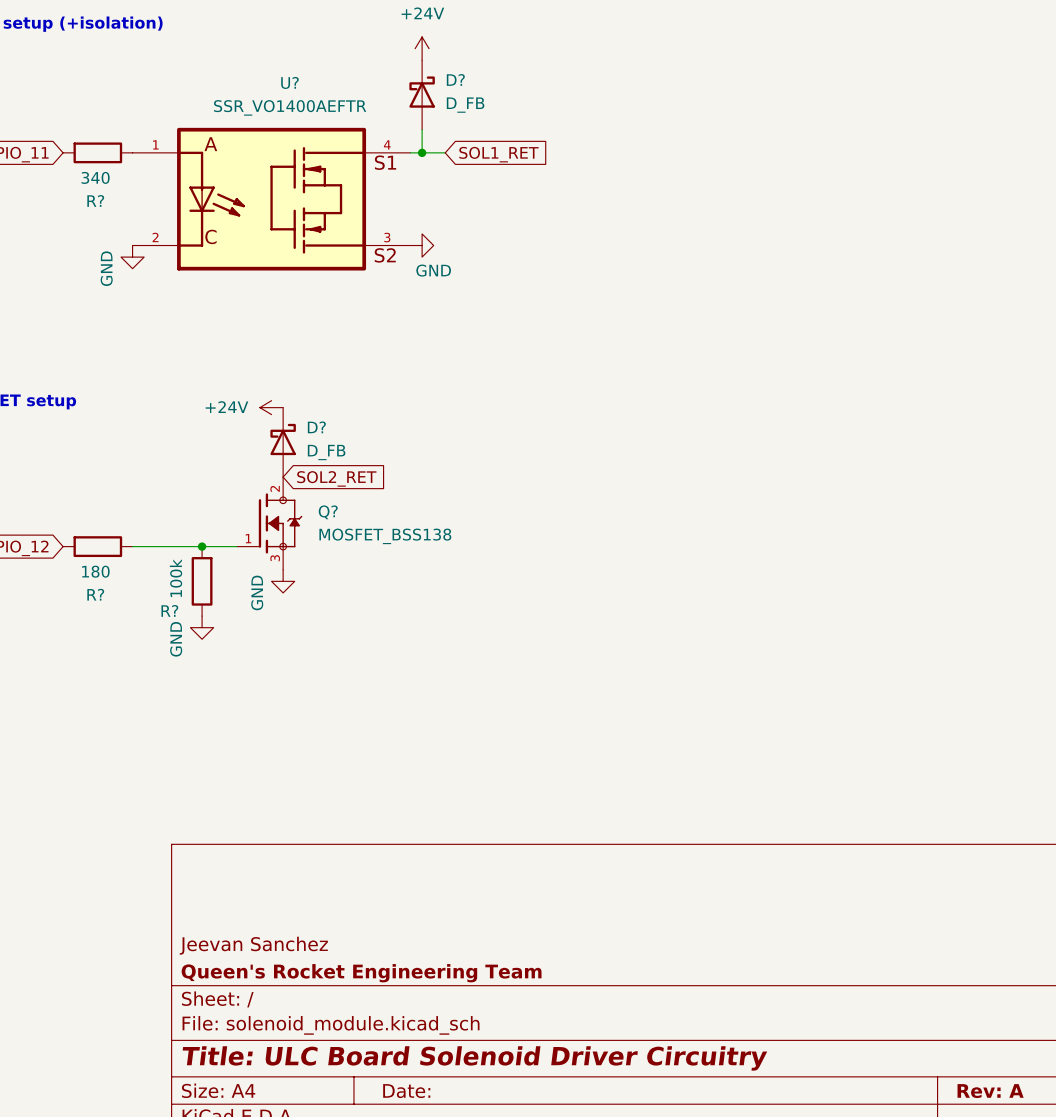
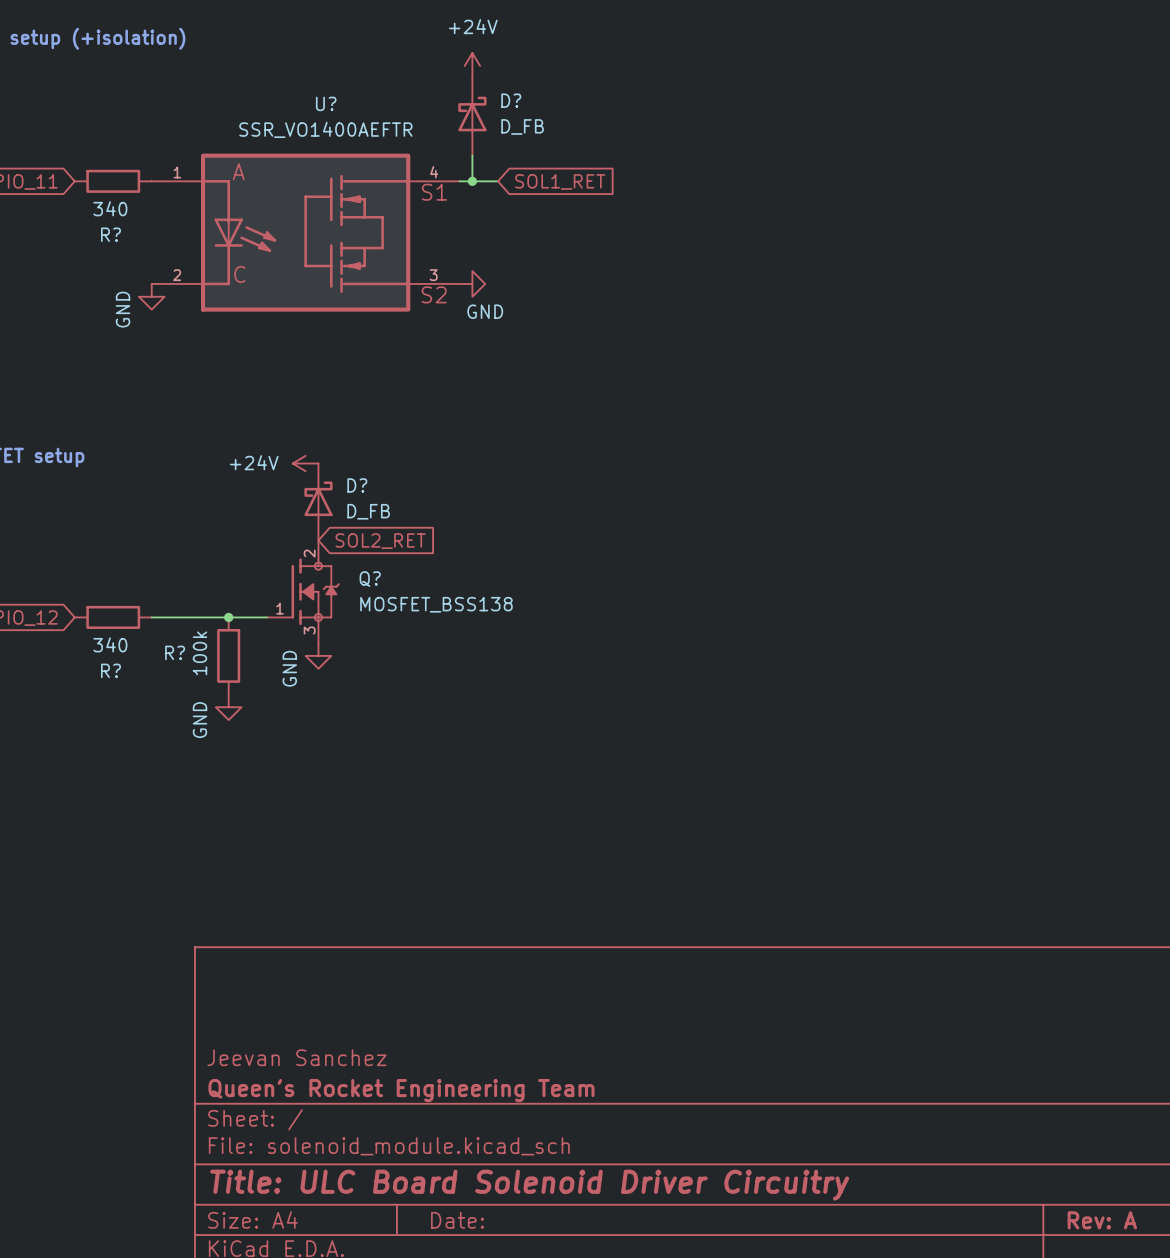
R? value: 180 (95, 571) -> 340 (110, 644)
R? name position: R? (169, 610) -> R? (175, 652)

